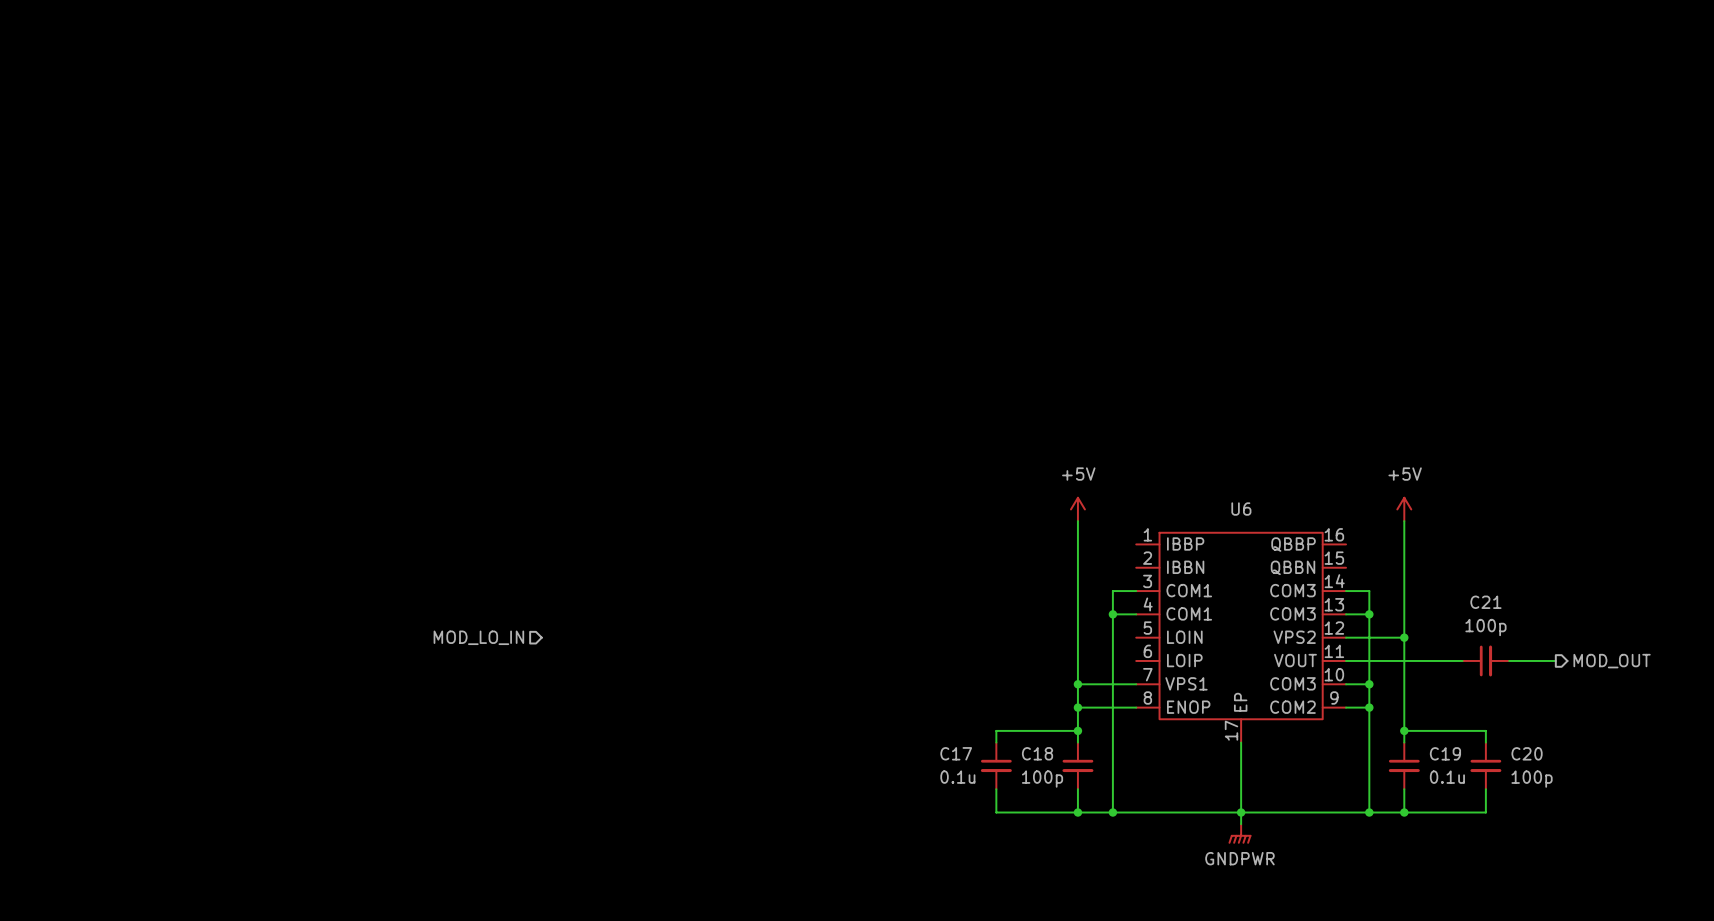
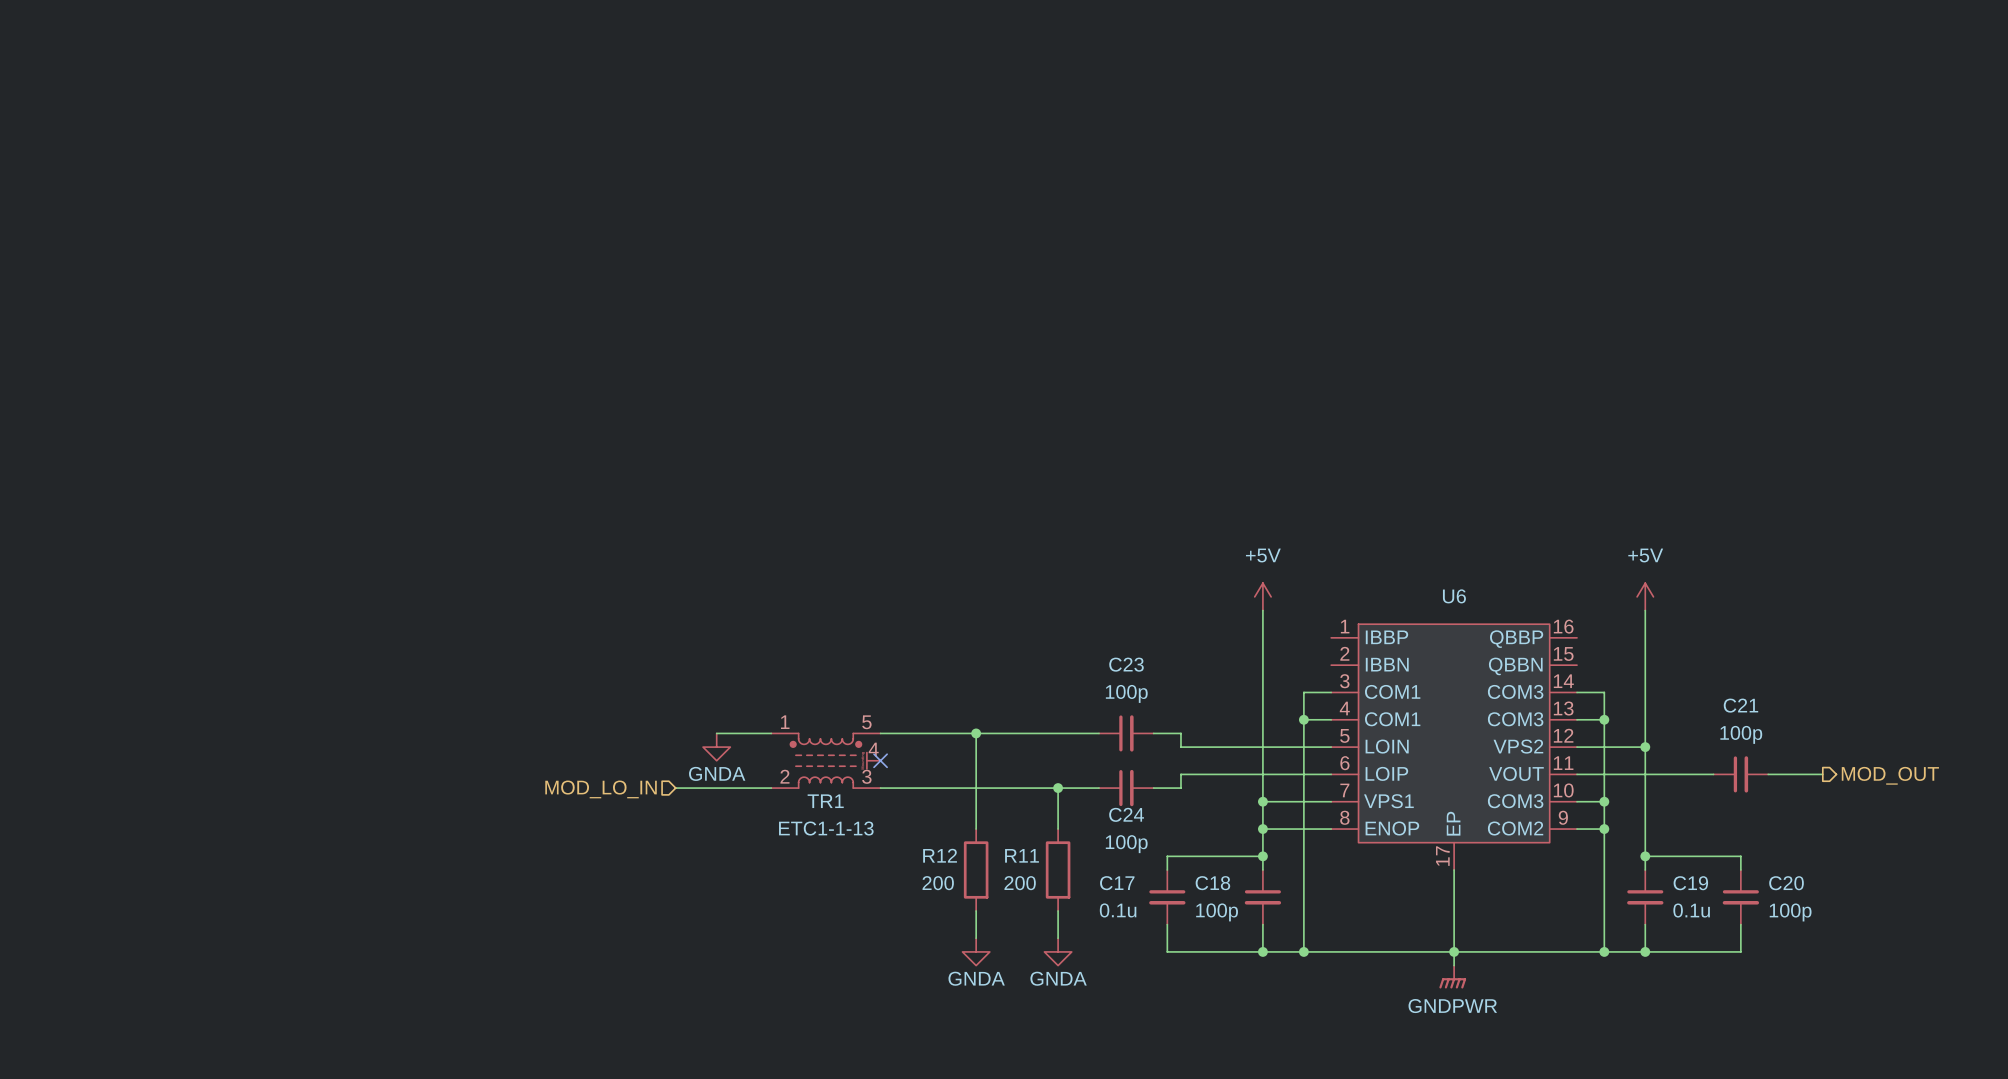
wire: none -> (716, 733) (771, 733)
wire: none -> (880, 733) (1099, 733)
wire: none -> (976, 733) (976, 829)
junction: none -> (976, 733)
C23: none -> 100p (1126, 733)
wire: none -> (1153, 733) (1180, 733) (1180, 747) (1331, 747)
hierarchical label position: MOD_LO_IN (478, 637) -> MOD_LO_IN (601, 789)
power symbol: none -> GNDA (716, 747)
TR1: none -> ETC1-1-13 (825, 760)
no-connect mark: none -> (880, 760)
wire: none -> (1331, 774) (1180, 774) (1180, 788) (1153, 788)
wire: none -> (675, 788) (771, 788)
wire: none -> (880, 788) (1099, 788)
wire: none -> (1058, 788) (1058, 829)
junction: none -> (1058, 788)
C24: none -> 100p (1126, 788)
R12: none -> 200 (976, 870)
R11: none -> 200 (1058, 870)
wire: none -> (976, 910) (976, 938)
wire: none -> (1058, 910) (1058, 938)
power symbol: none -> GNDA (976, 951)
power symbol: none -> GNDA (1058, 951)

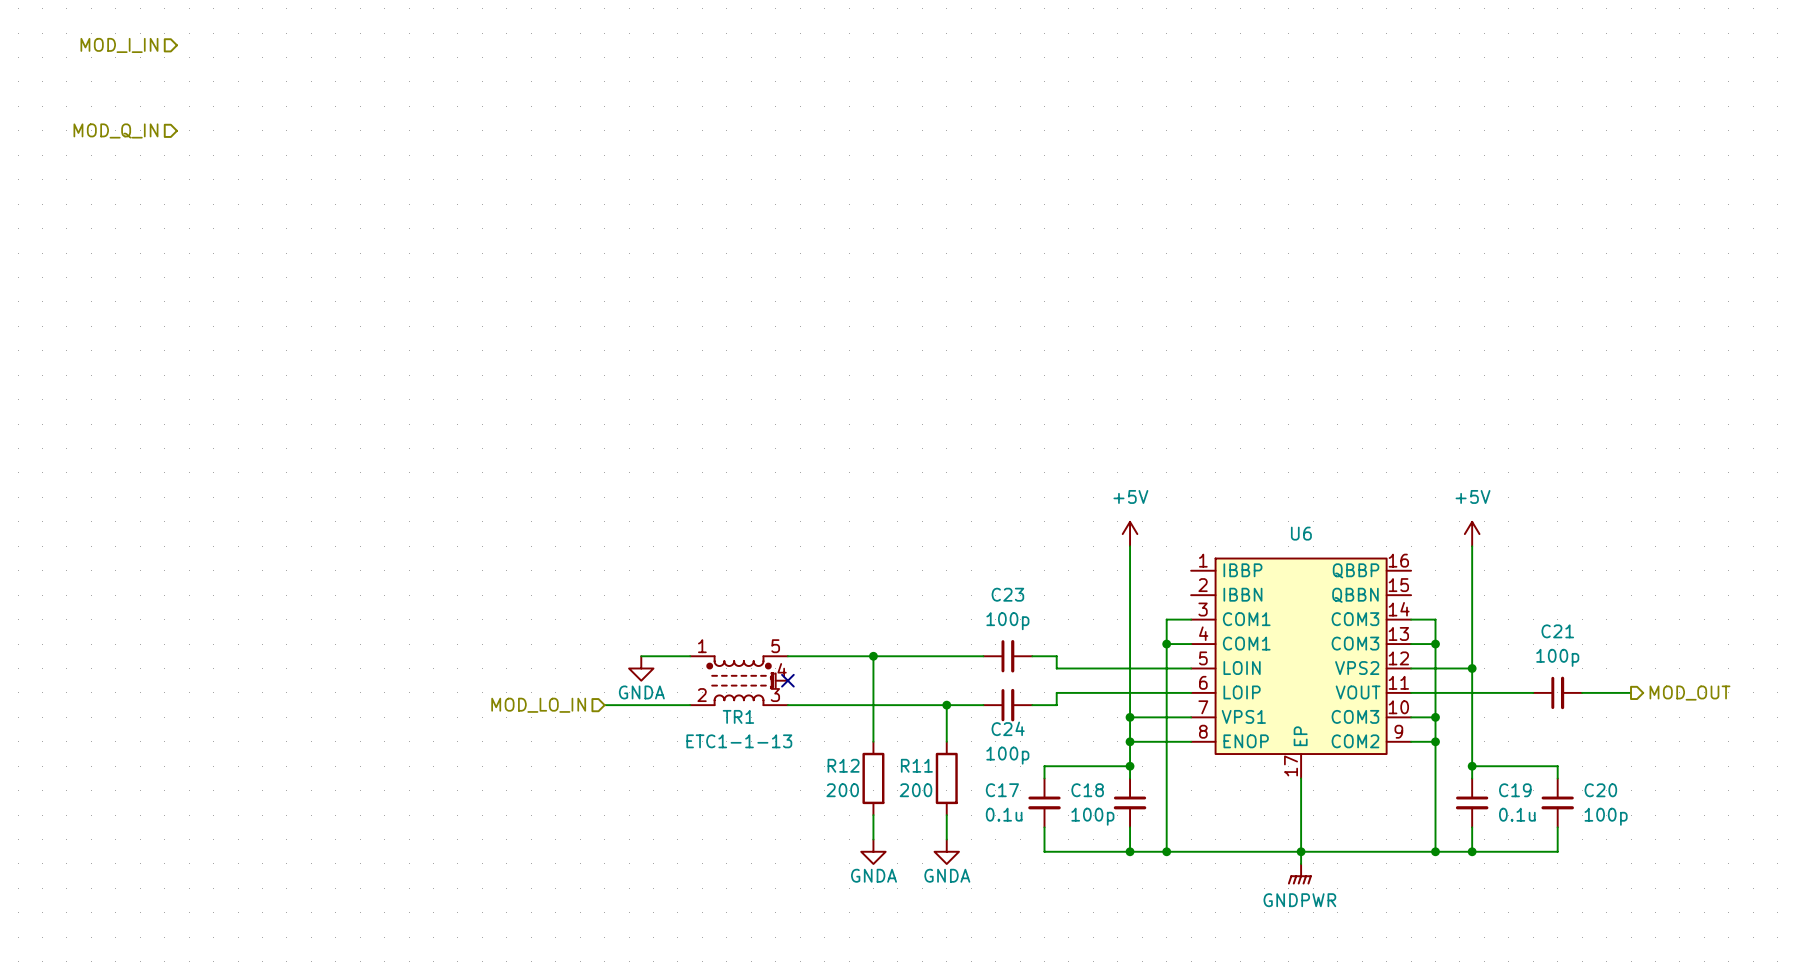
hierarchical label: none -> MOD_I_IN (119, 45)
hierarchical label: none -> MOD_Q_IN (115, 130)

